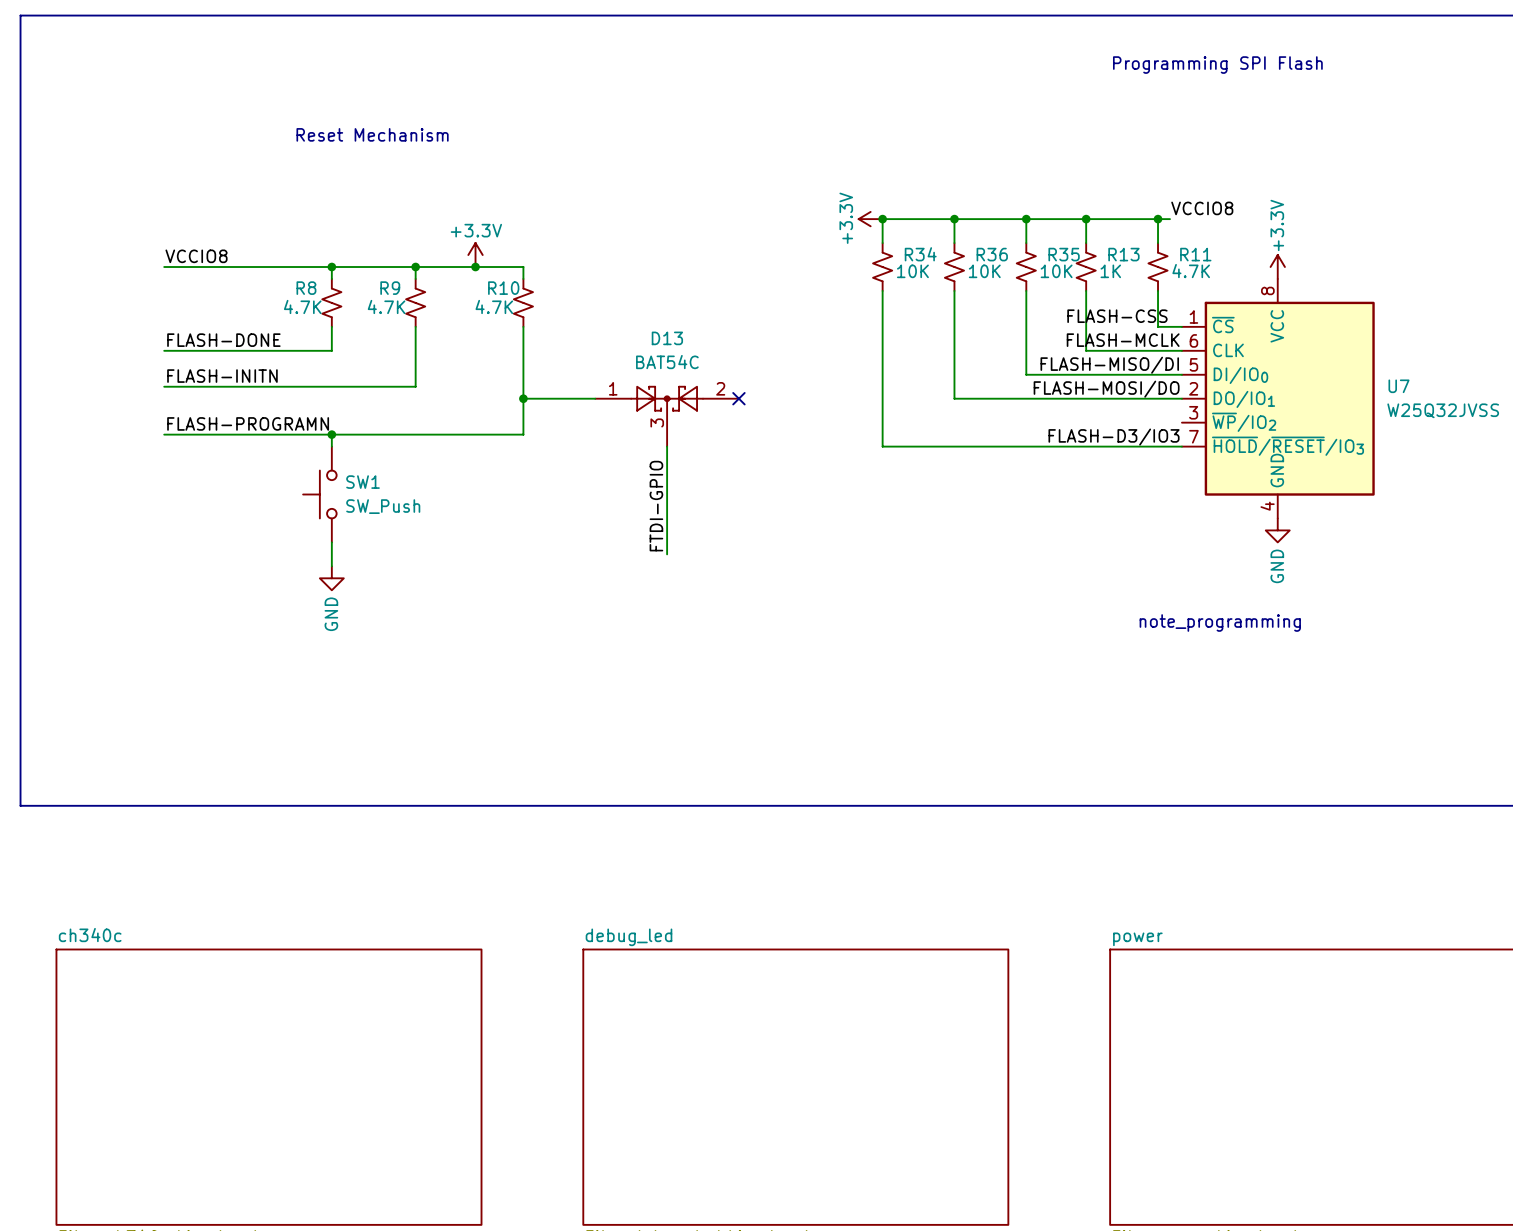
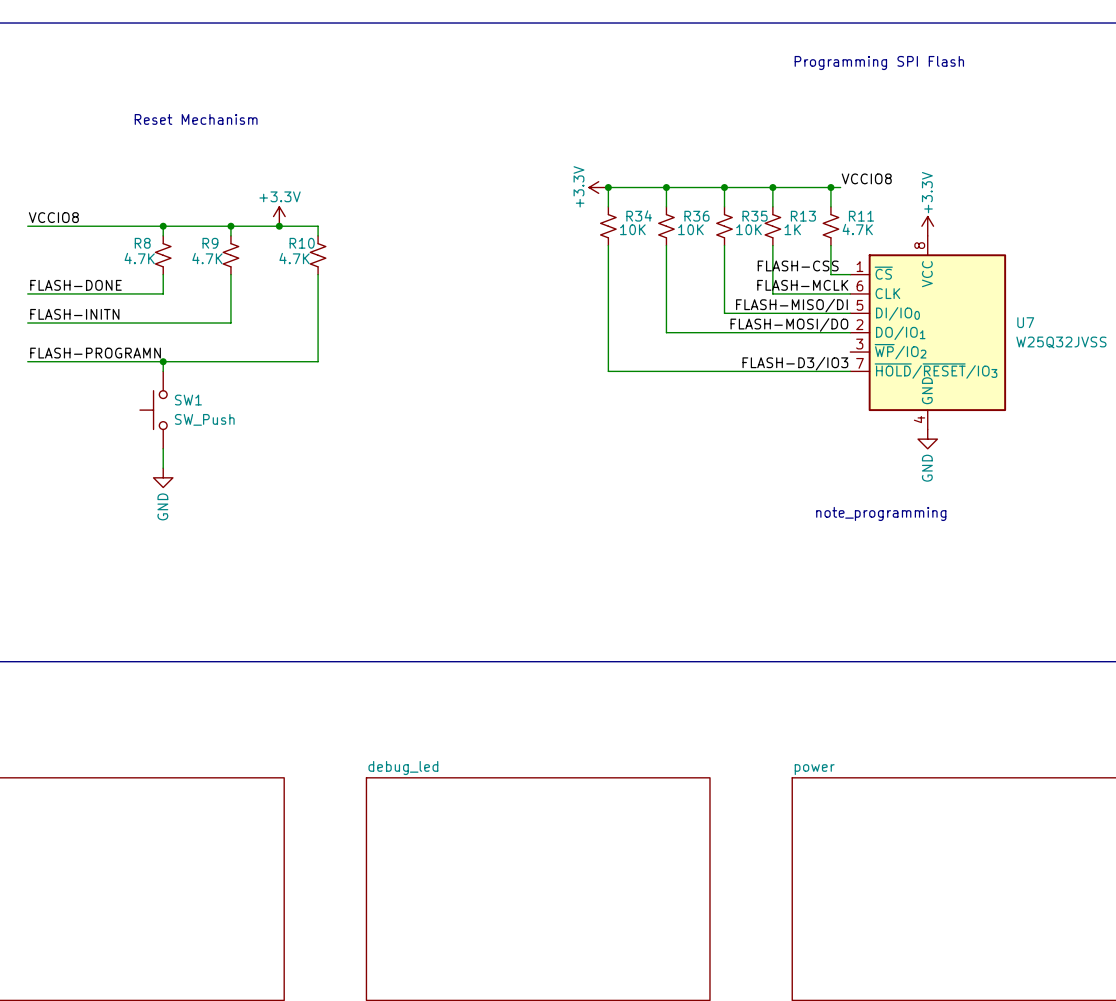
wire: (523, 398) (595, 398) -> none
junction: (523, 398) -> none
no-connect mark: (738, 398) -> none
D13: BAT54C (667, 416) -> none
wire: (667, 446) (667, 554) -> none
label: FTDI-GPIO (656, 506) -> none

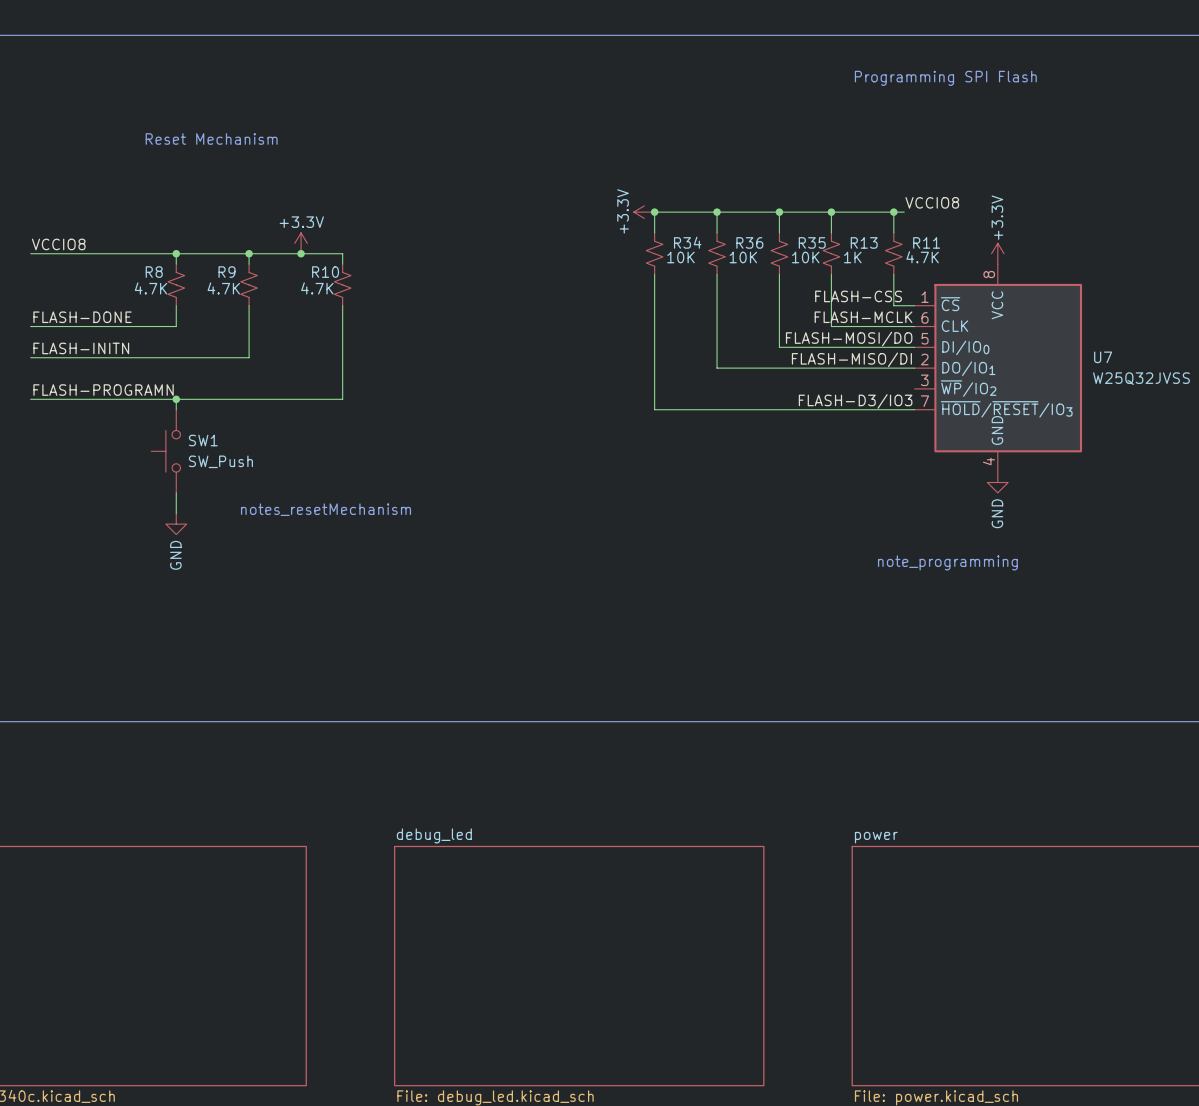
label: FLASH-MISO/DI (791, 305) -> FLASH-MOSI/DO (849, 339)
label: FLASH-MOSI/DO (789, 324) -> FLASH-MISO/DI (851, 359)
text: none -> notes_resetMechanism (326, 509)

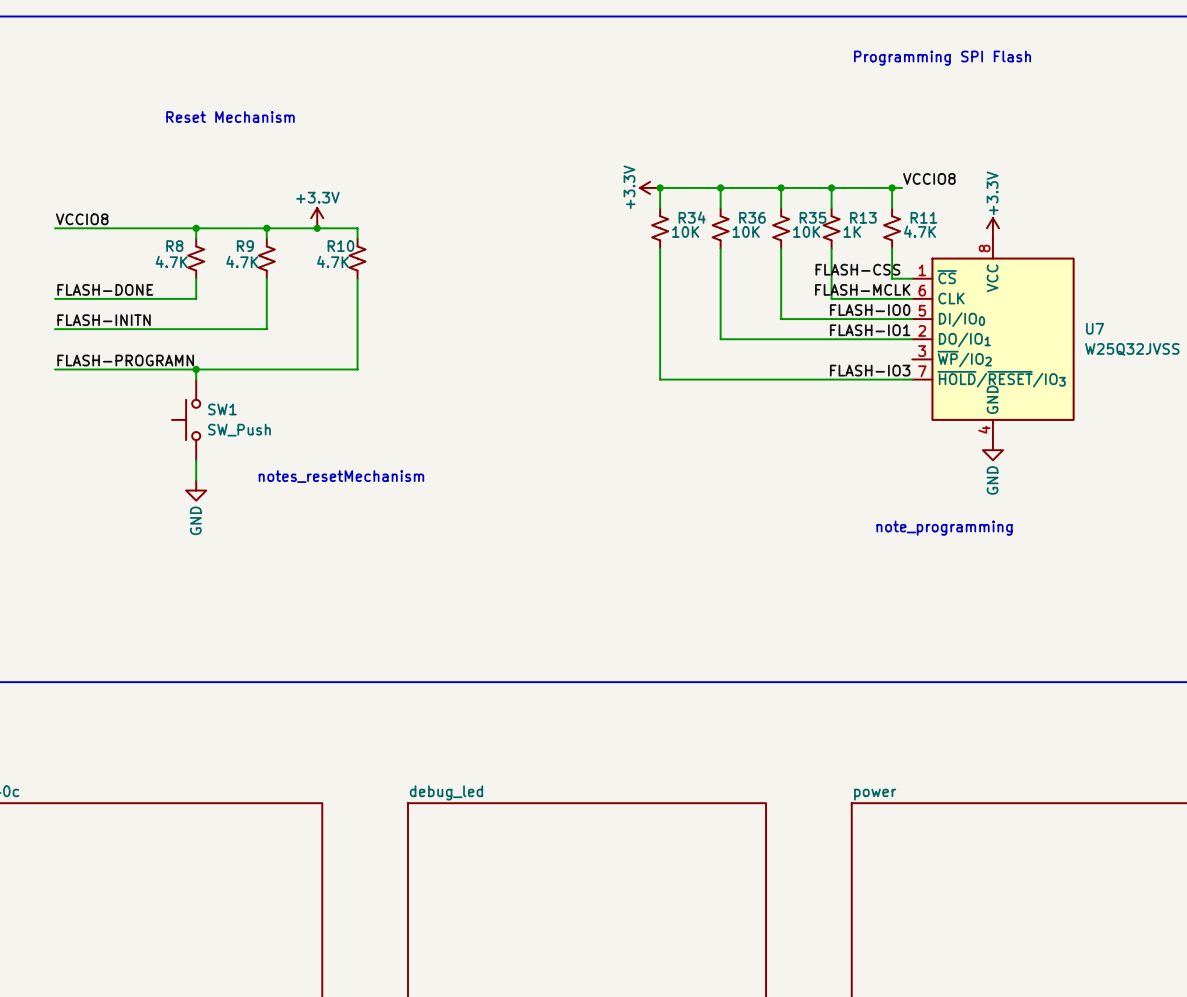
label: FLASH-MOSI/DO (849, 339) -> FLASH-IO0 (870, 310)
label: FLASH-MISO/DI (851, 359) -> FLASH-IO1 (870, 330)
label: FLASH-D3/IO3 (855, 401) -> FLASH-IO3 (870, 370)

